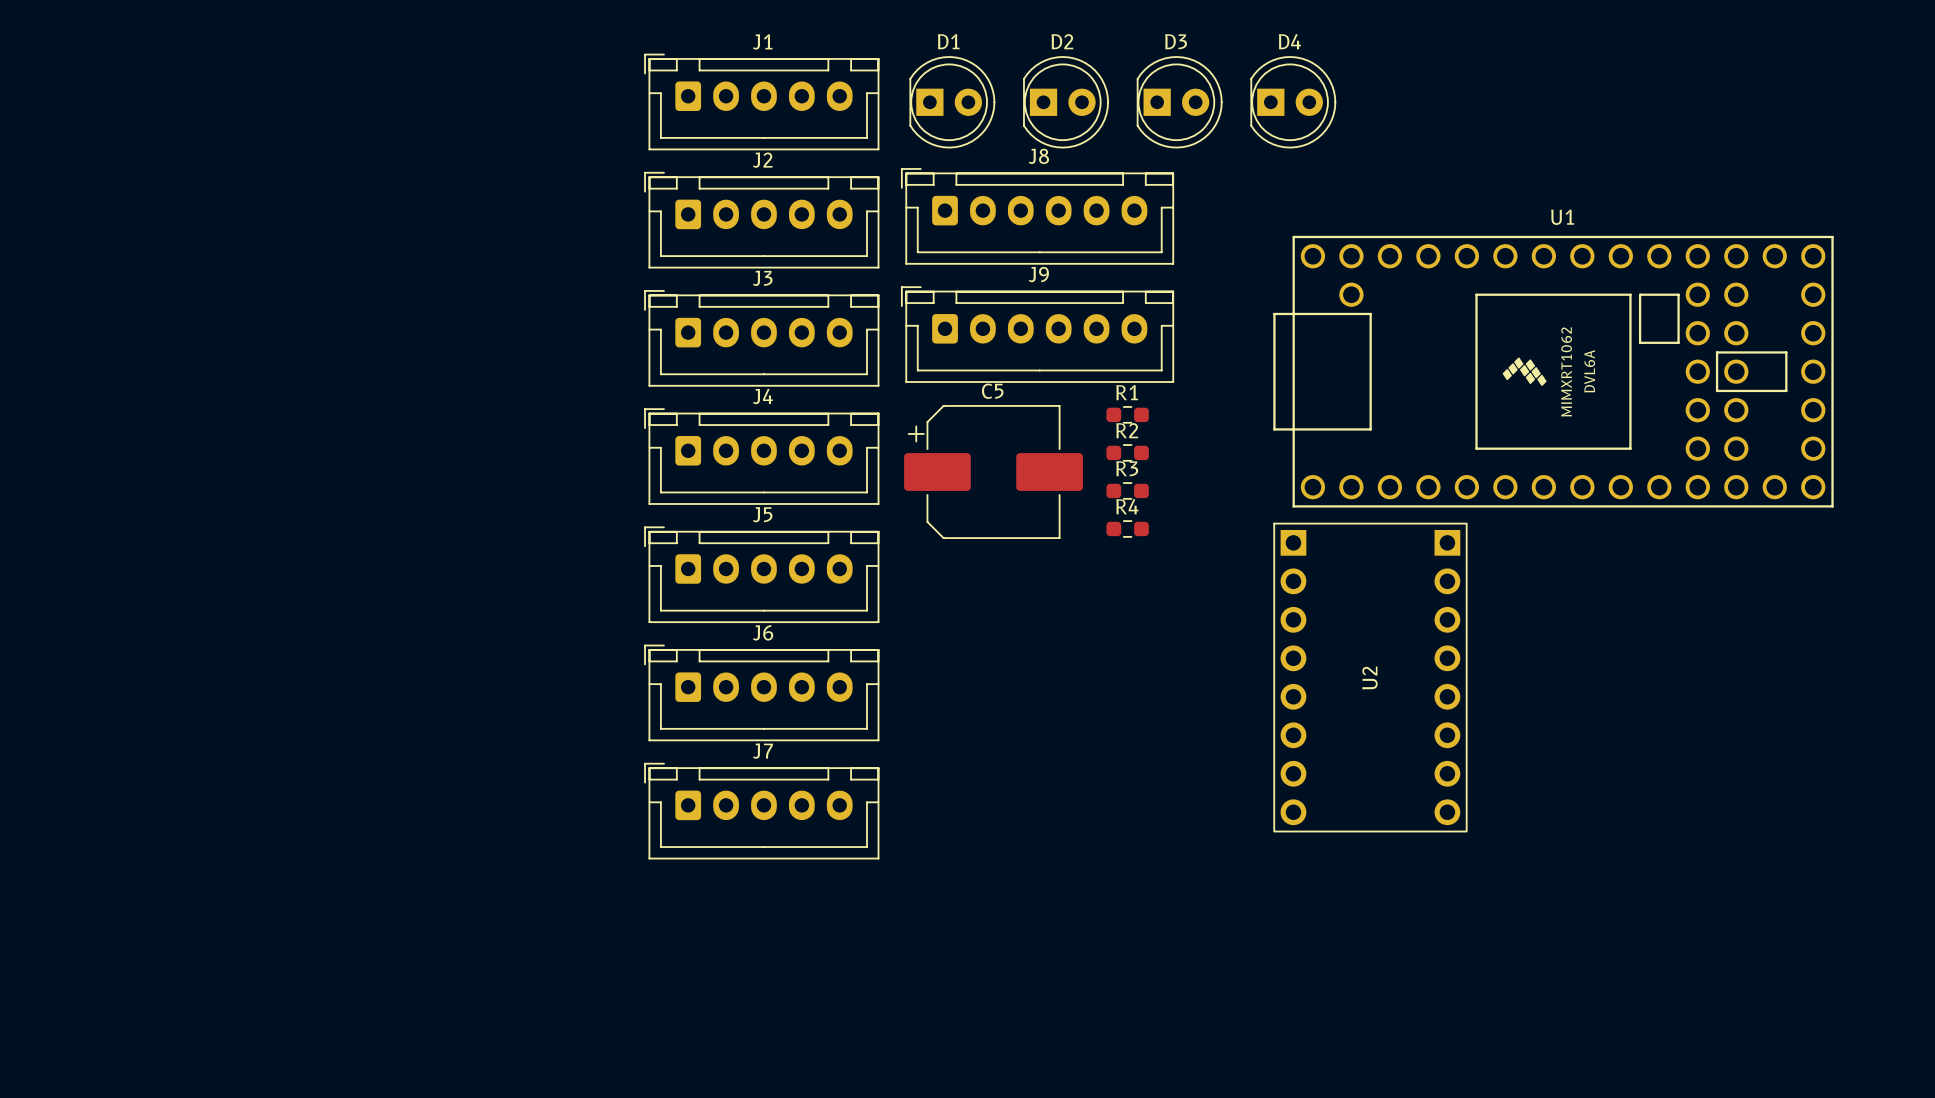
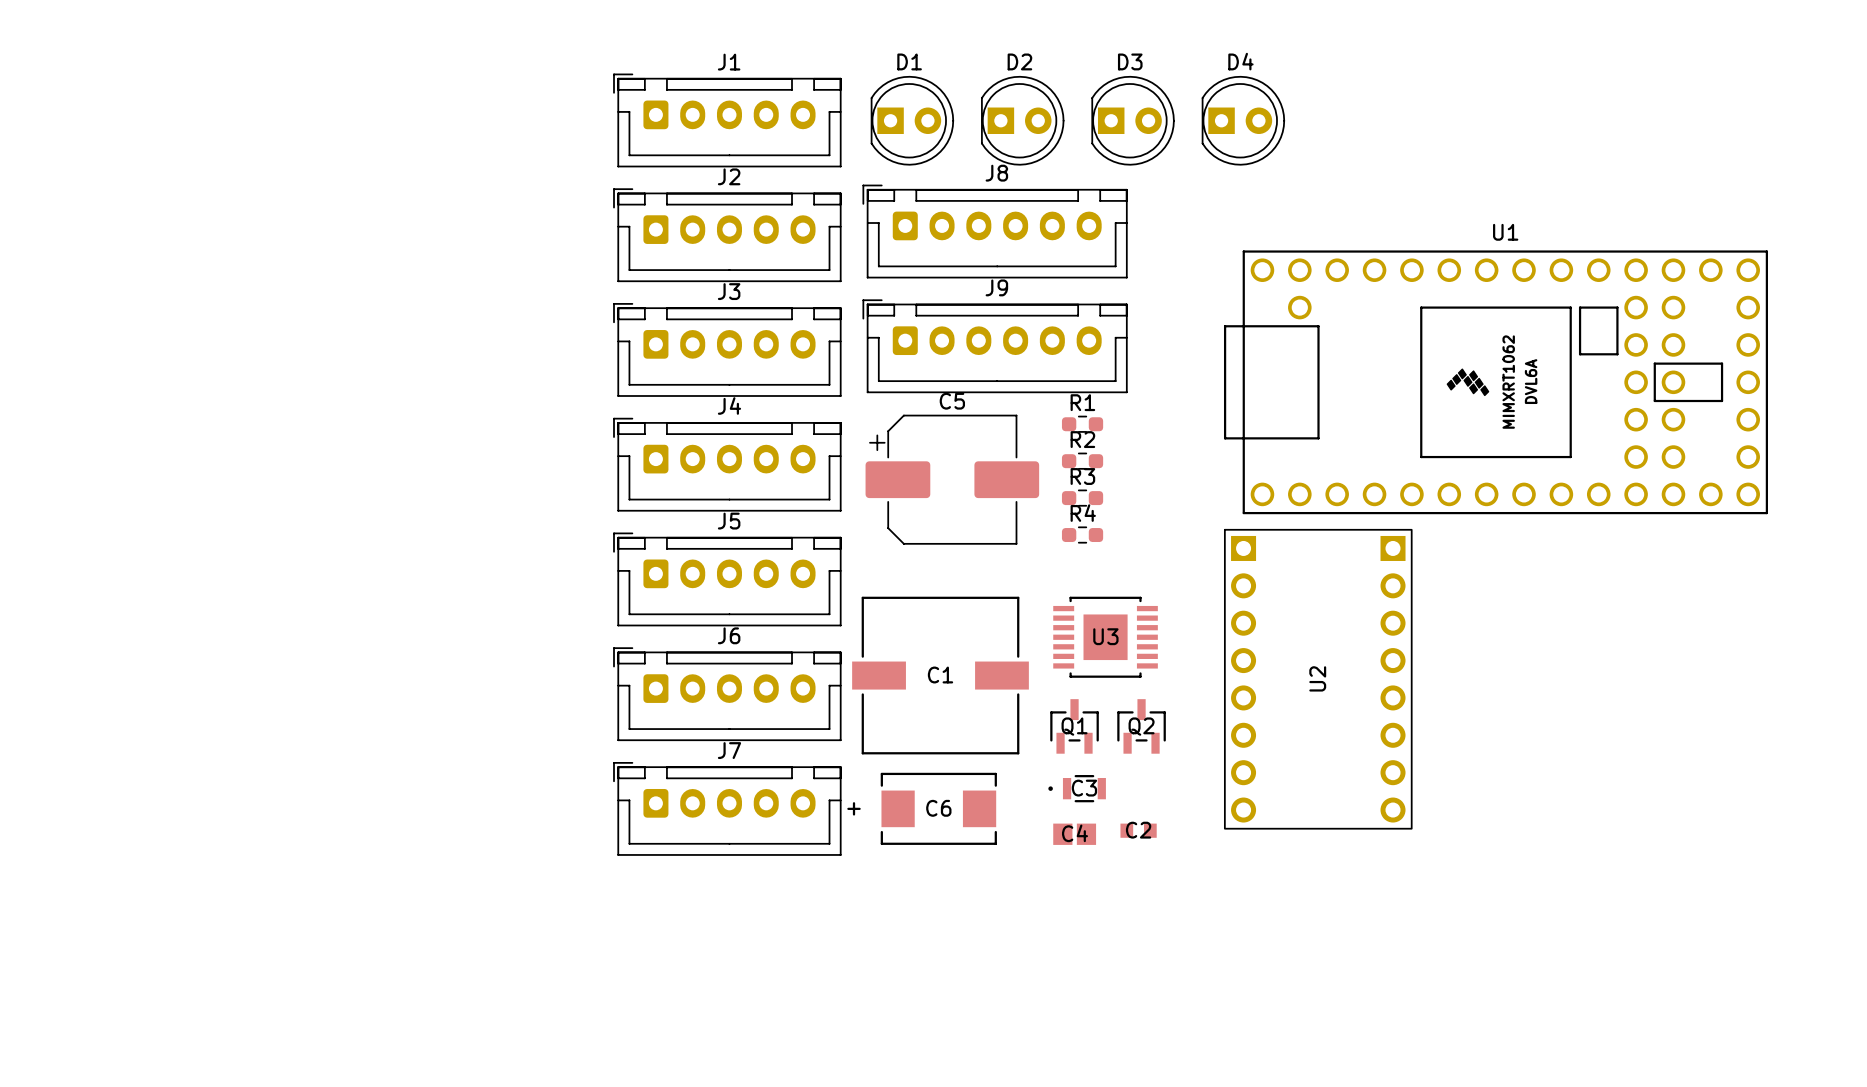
U3: none -> (1105, 637)
C1: none -> (940, 675)
Q1: none -> (1074, 726)
Q2: none -> (1141, 726)
C3: none -> (1077, 788)
C6: none -> (922, 808)
C2: none -> (1138, 830)
C4: none -> (1074, 834)

